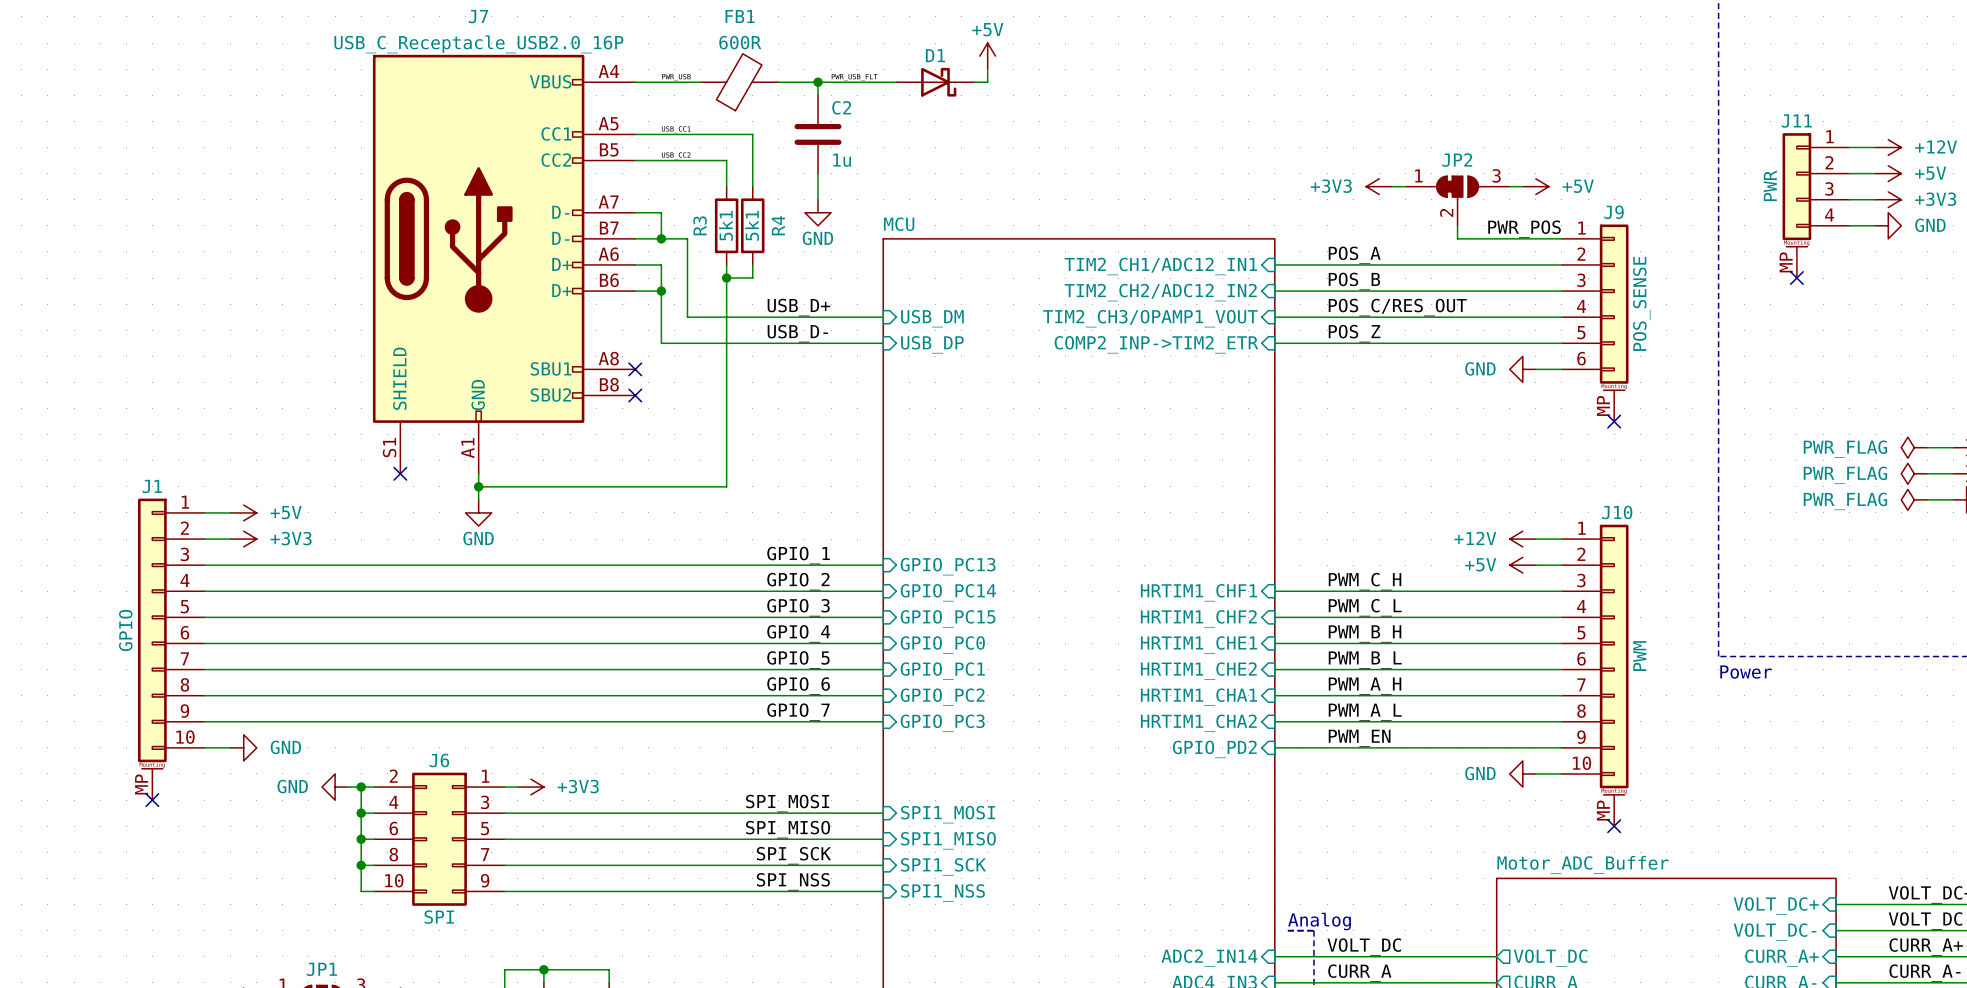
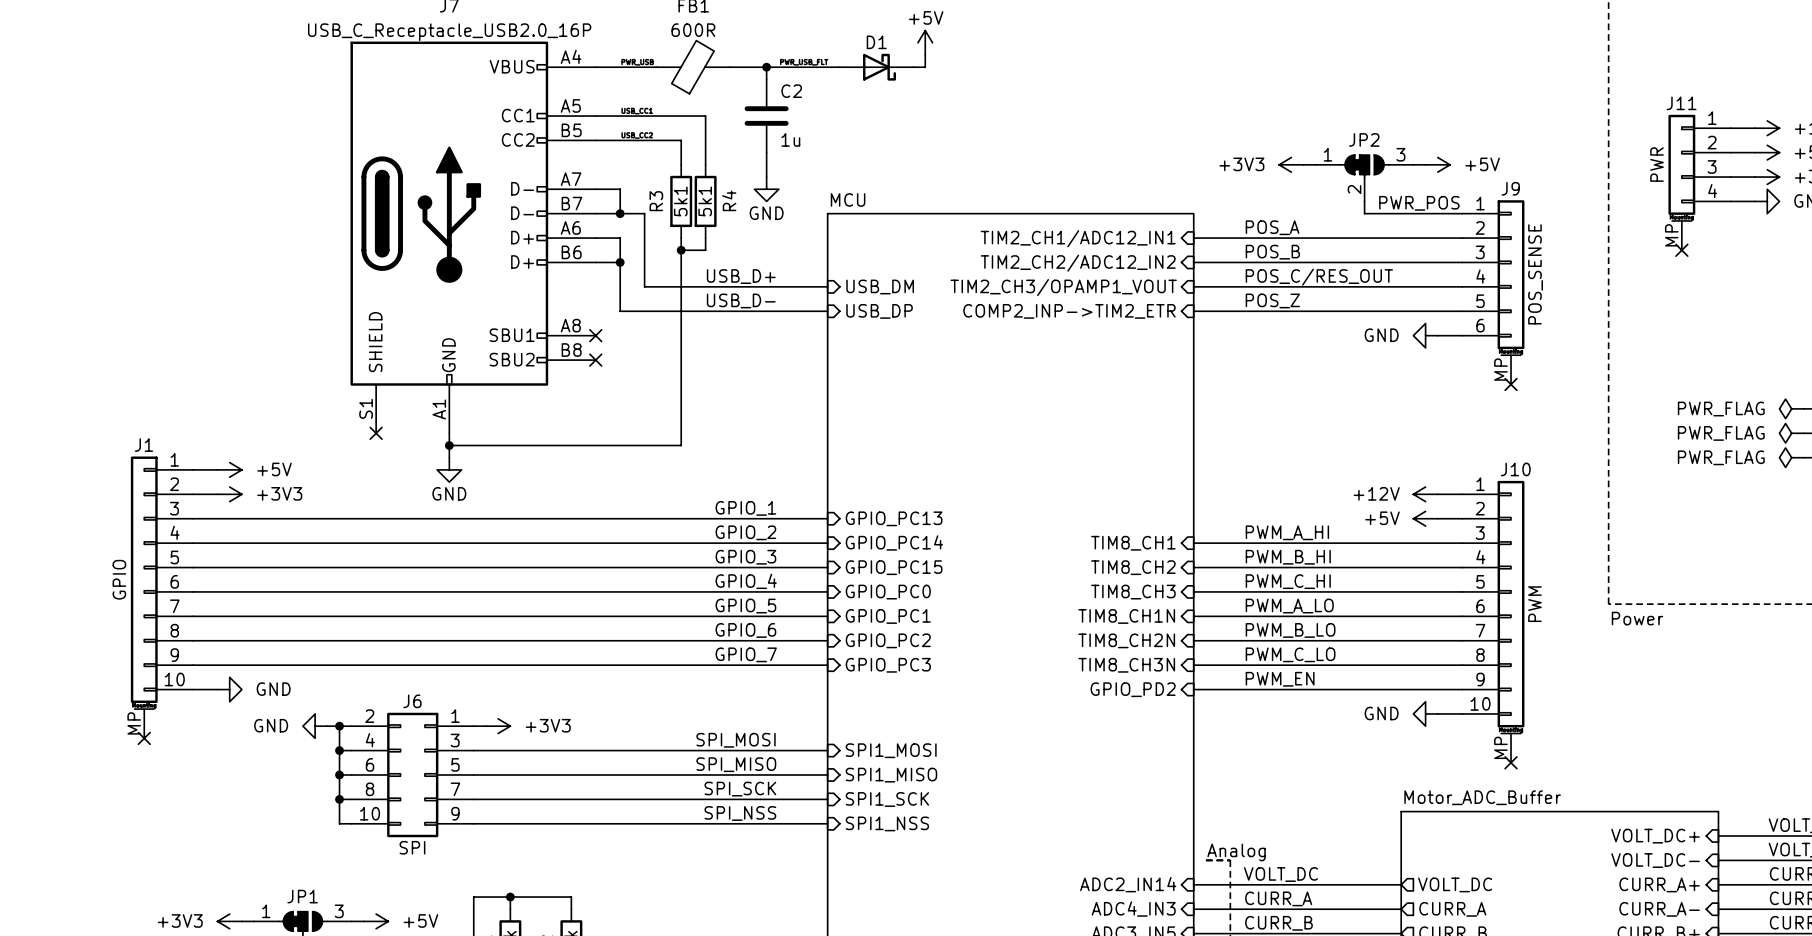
label: PWM_C_H (1365, 581) -> PWM_A_HI (1287, 532)
sheet pin: HRTIM1_CHF1 (1198, 592) -> TIM8_CH1 (1133, 543)
label: PWM_C_L (1365, 607) -> PWM_B_HI (1288, 557)
sheet pin: HRTIM1_CHF2 (1198, 618) -> TIM8_CH2 (1133, 567)
label: PWM_B_H (1365, 633) -> PWM_C_HI (1288, 581)
sheet pin: HRTIM1_CHE1 (1198, 644) -> TIM8_CH3 (1133, 592)
label: PWM_B_L (1365, 660) -> PWM_A_LO (1289, 606)
sheet pin: HRTIM1_CHE2 (1198, 671) -> TIM8_CH1N (1126, 616)
label: PWM_A_H (1365, 686) -> PWM_B_LO (1290, 630)
sheet pin: HRTIM1_CHA1 (1198, 697) -> TIM8_CH2N (1126, 640)
label: PWM_A_L (1365, 712) -> PWM_C_LO (1290, 654)
sheet pin: HRTIM1_CHA2 (1198, 723) -> TIM8_CH3N (1126, 665)

